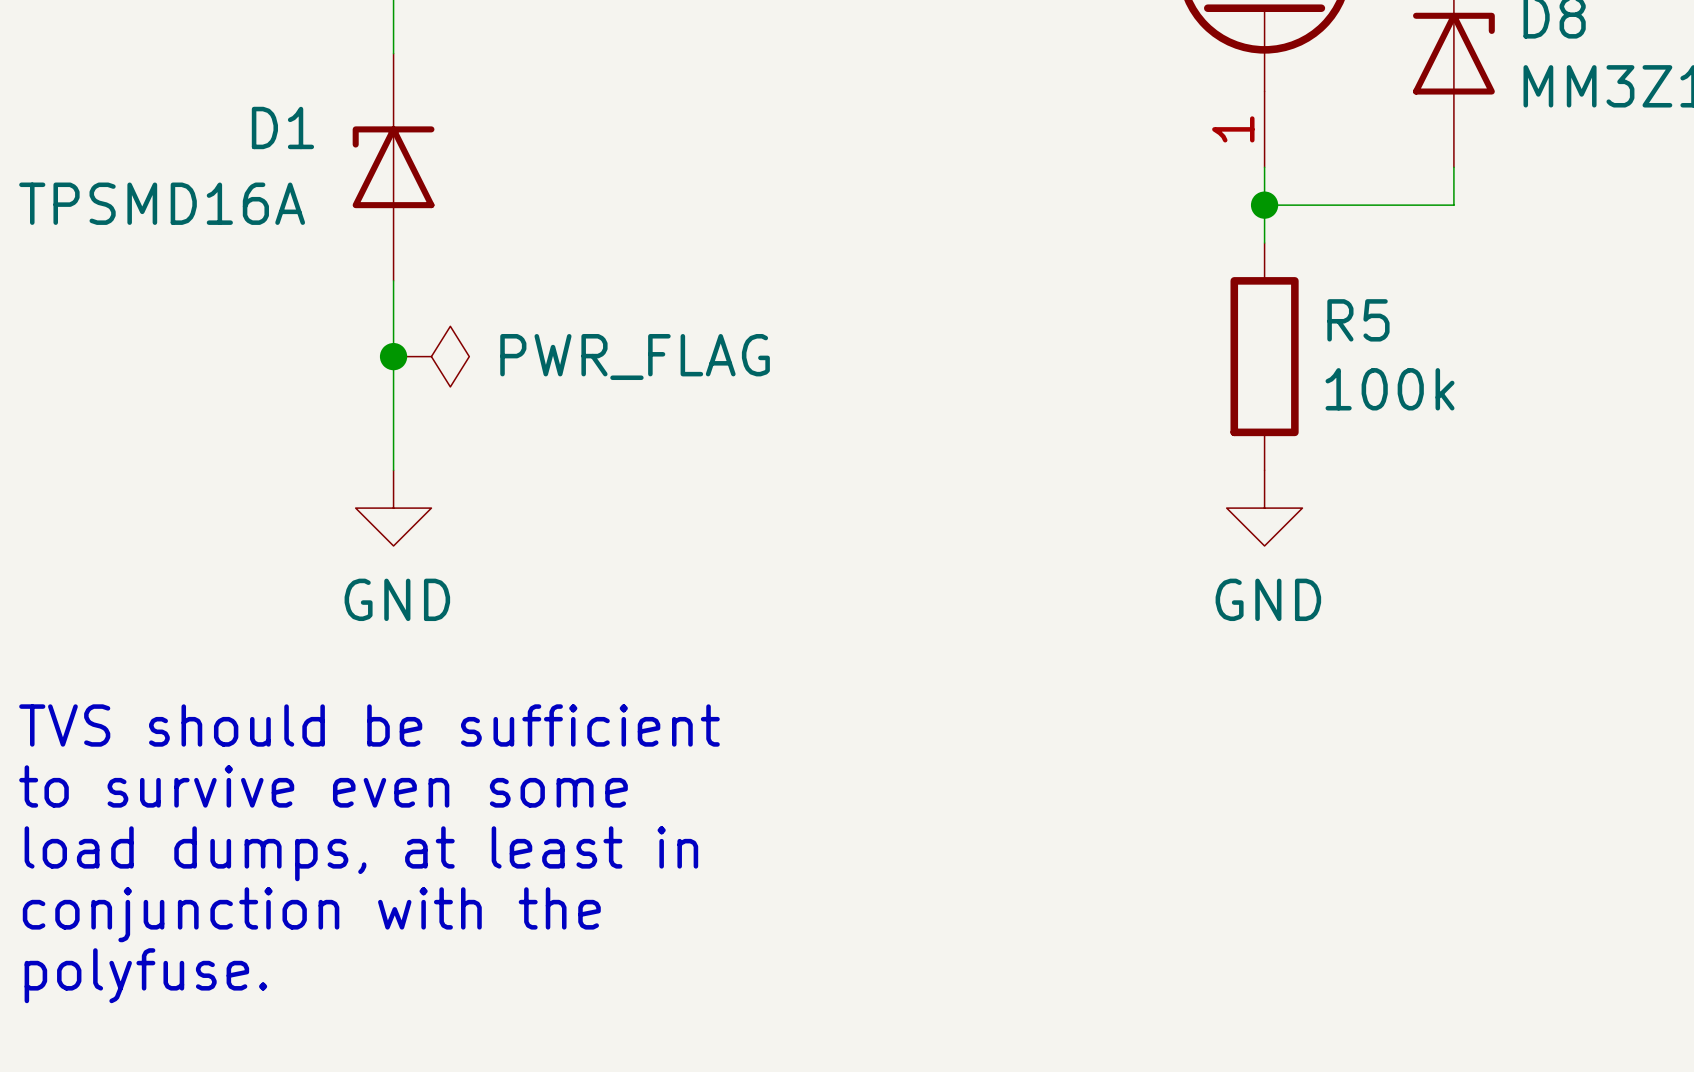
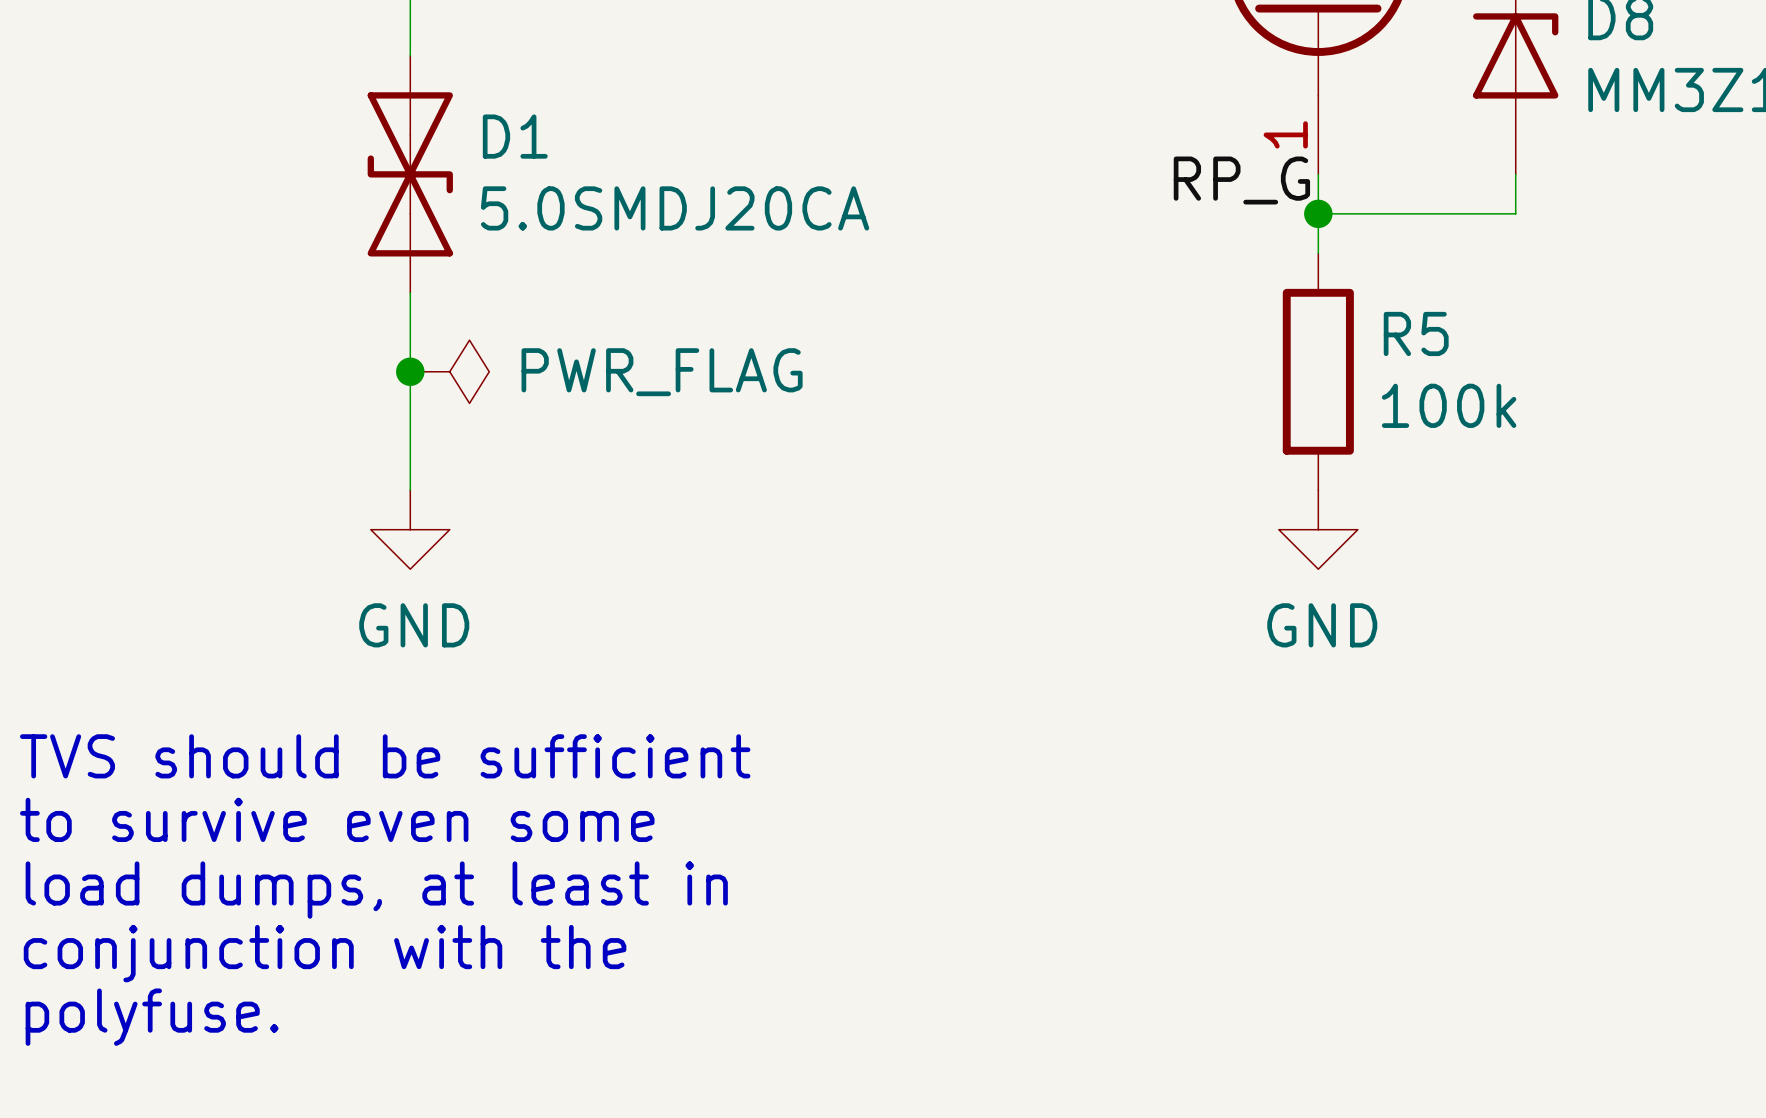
D1 symbol: [352, 53, 435, 281] -> [367, 55, 453, 293]
D1 name position: D1 (282, 127) -> D1 (515, 136)
label: none -> RP_G (1241, 180)
D1 value: TPSMD16A (162, 203) -> 5.0SMDJ20CA (675, 208)

